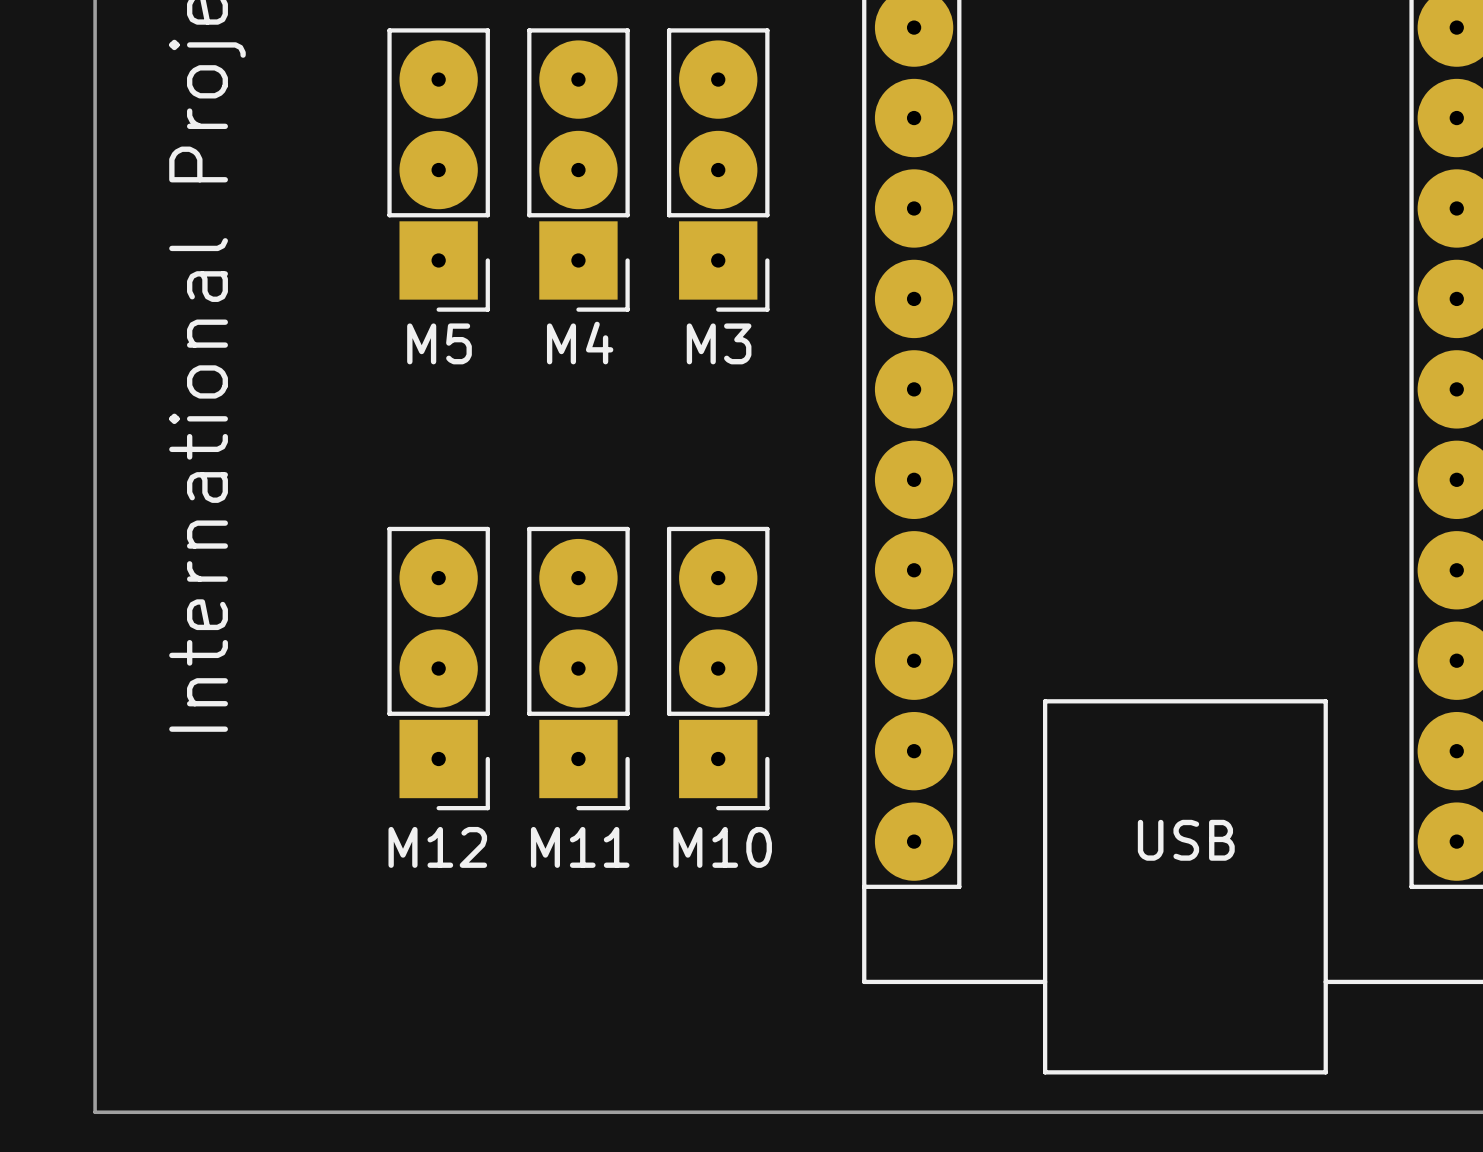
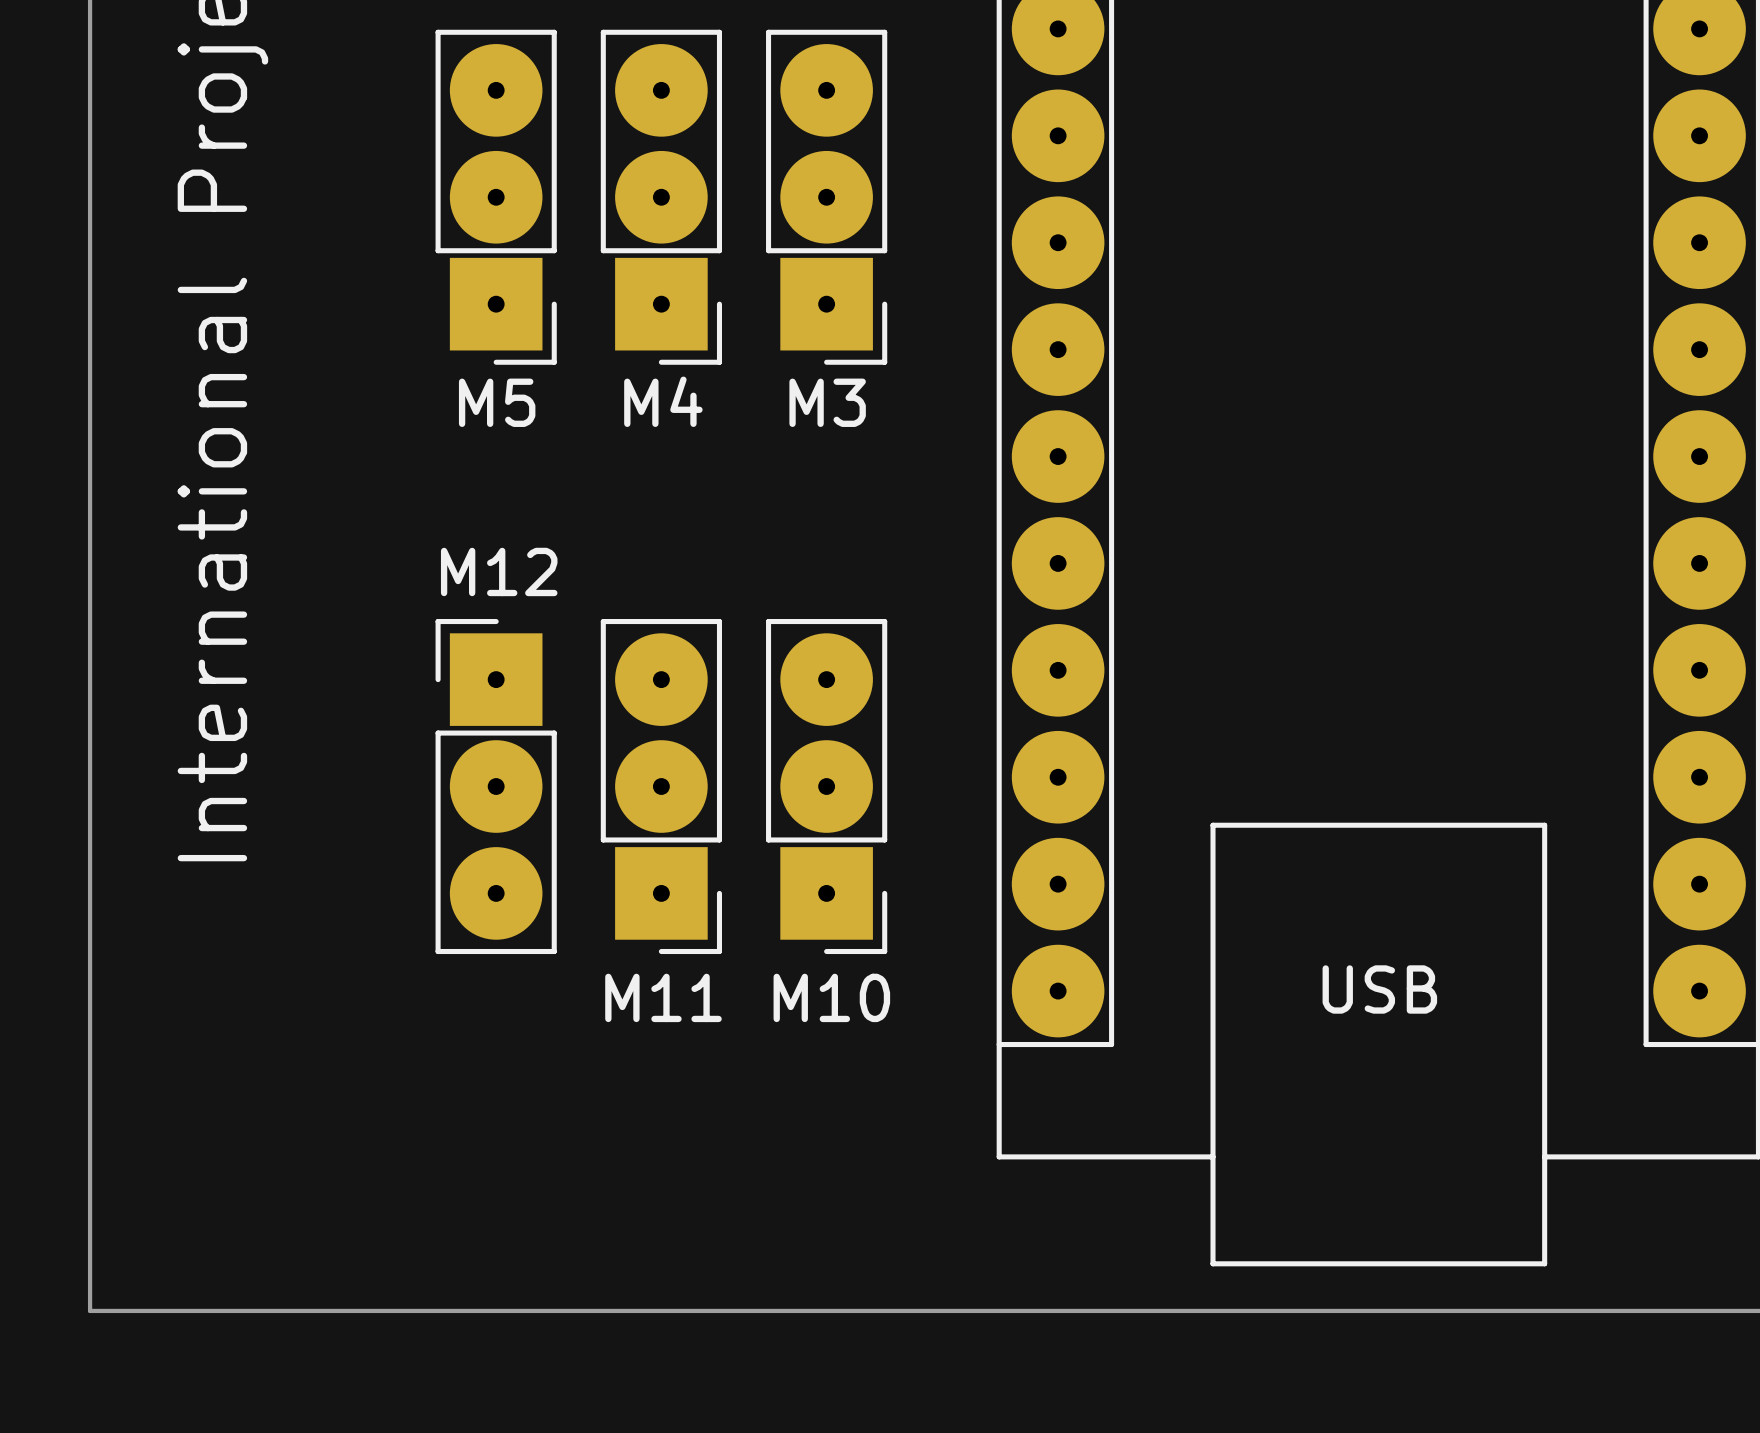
M12 rotation: 0° (438, 668) -> 180° (496, 786)

